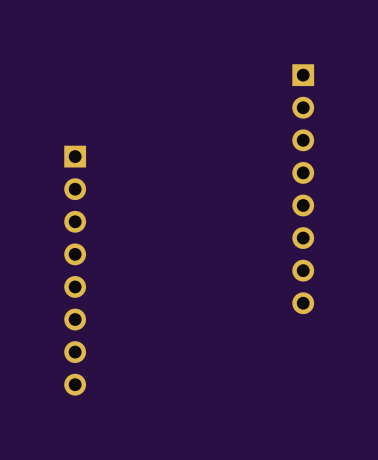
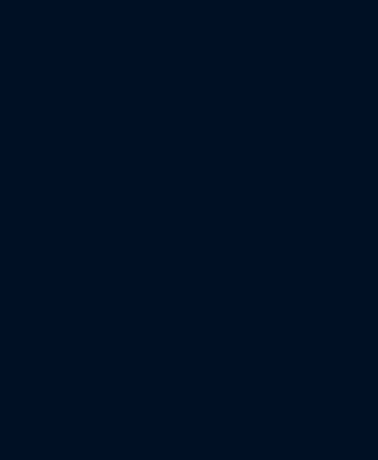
part: (303, 189) -> none
part: (75, 270) -> none

